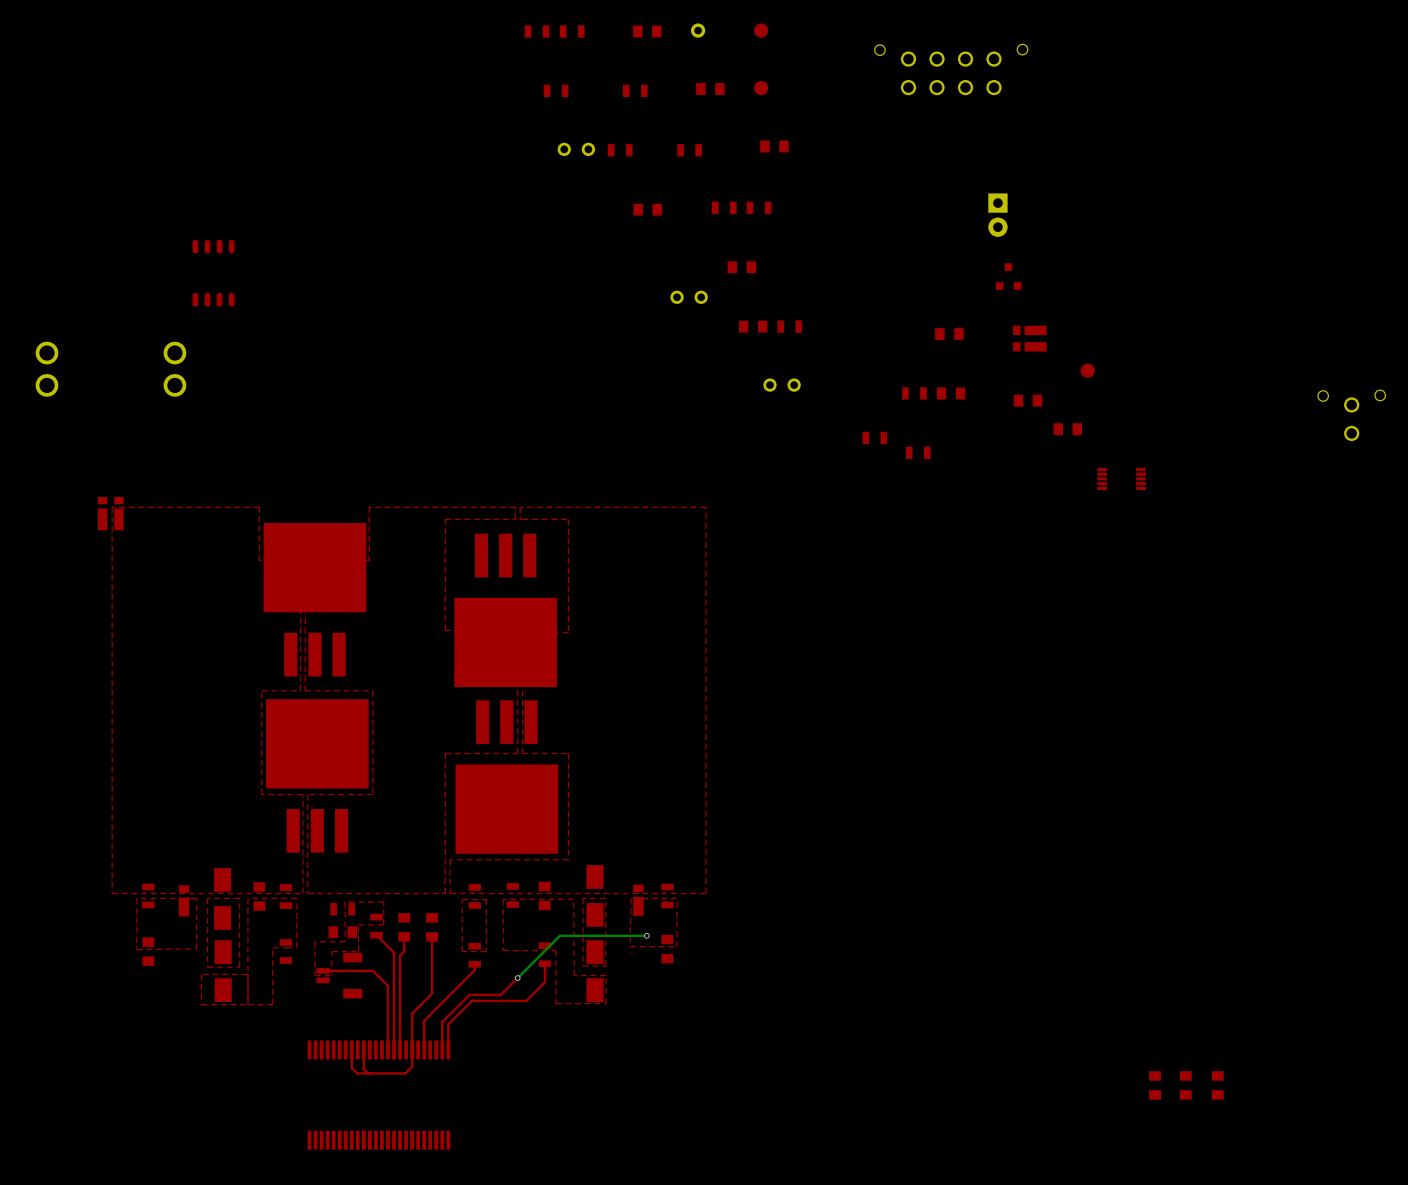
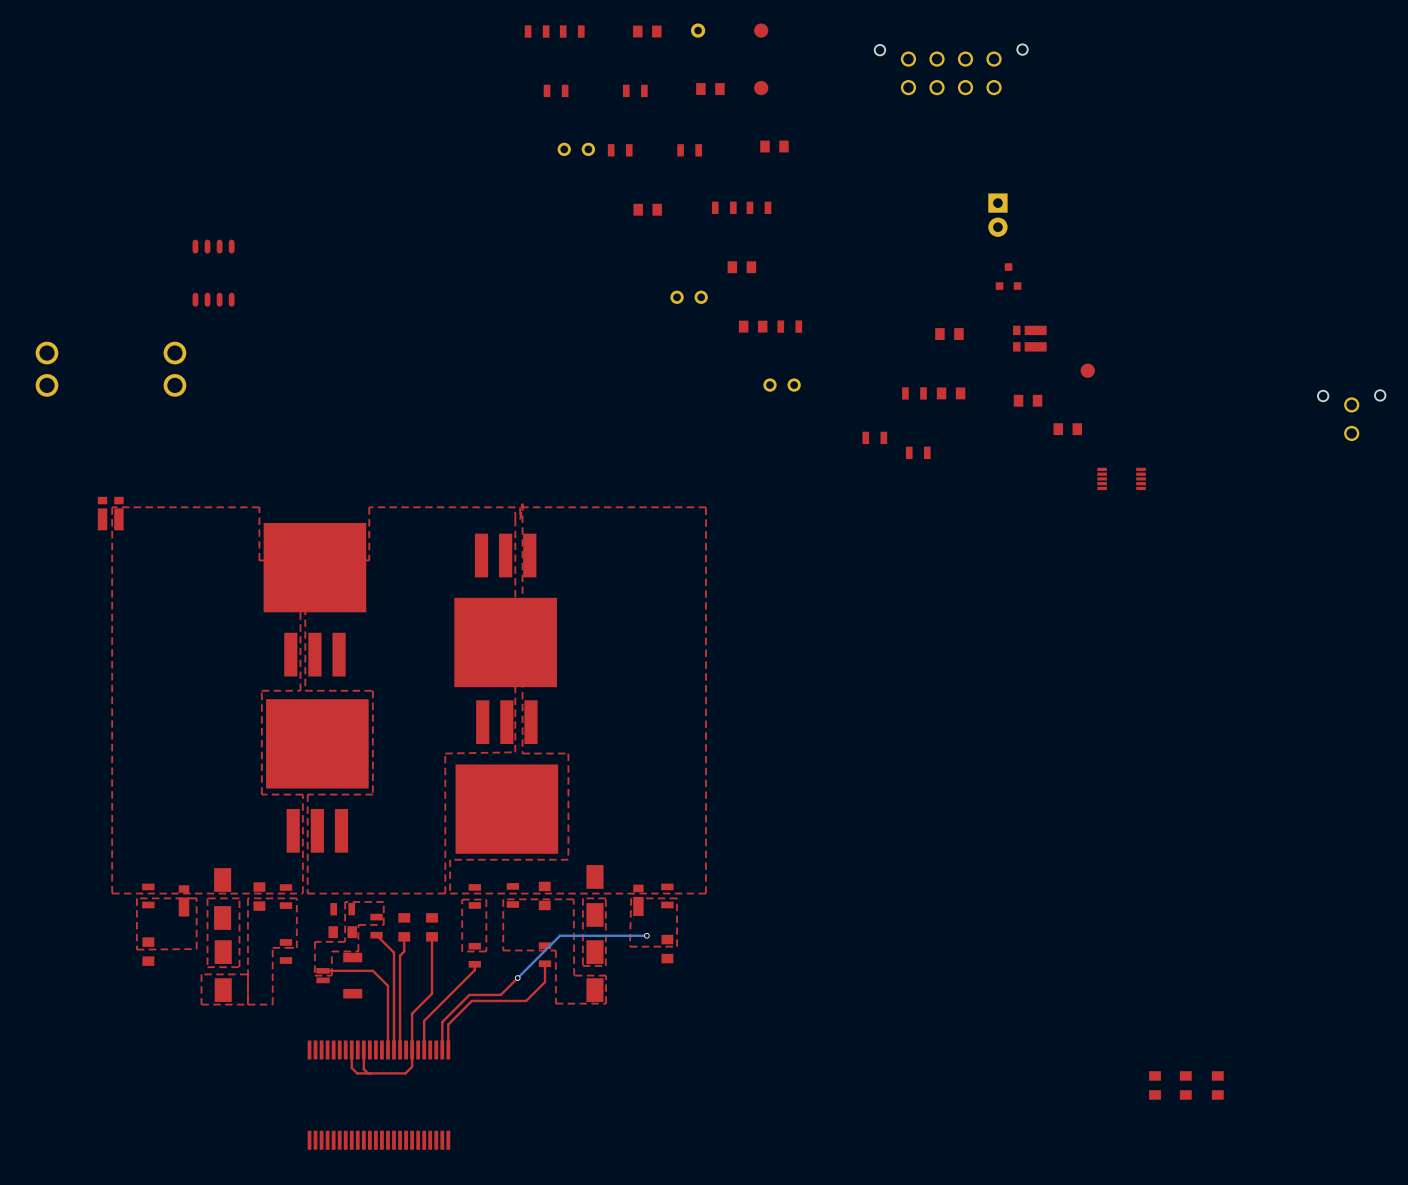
top zone outline: (515, 519) (445, 519) (445, 630) (517, 630) (517, 753) (445, 753) -> (515, 519) (515, 752) (445, 753)
top zone outline: (520, 519) (568, 519) (568, 632) (522, 632) -> (520, 519) (522, 503) (522, 632)

